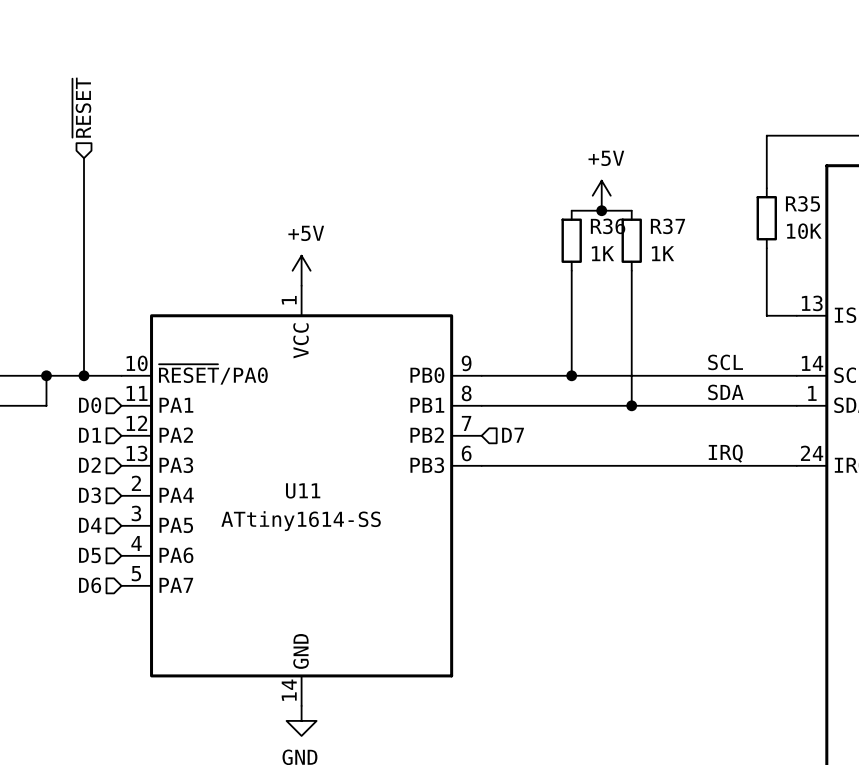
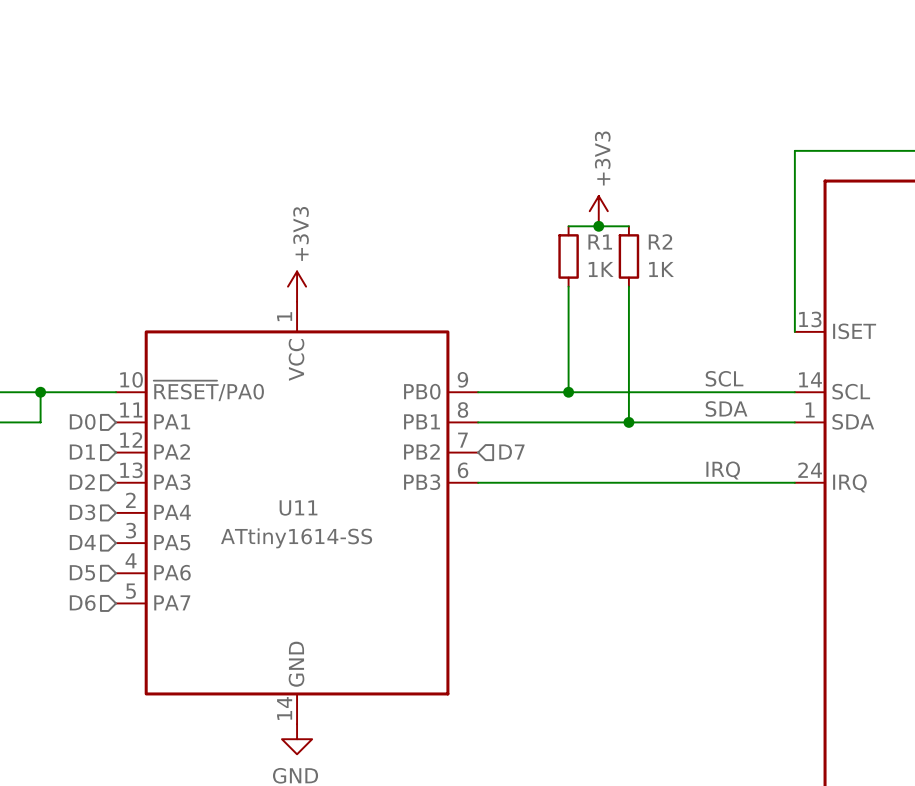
hierarchical label: ~{RESET} (81, 107) -> none
wire: (796, 135) (766, 135) (766, 188) -> none
wire: (84, 158) (84, 375) -> none
power symbol: +5V (601, 195) -> +3V3 (598, 211)
R35: 10K (766, 218) -> none
R36 name: R36 (608, 226) -> R1 (600, 242)
R37 name: R37 (667, 226) -> R2 (660, 241)
wire: (766, 248) (766, 315) (796, 315) -> (794, 150) (794, 331)
power symbol: +5V (301, 270) -> +3V3 (297, 286)
junction: (84, 375) -> none

